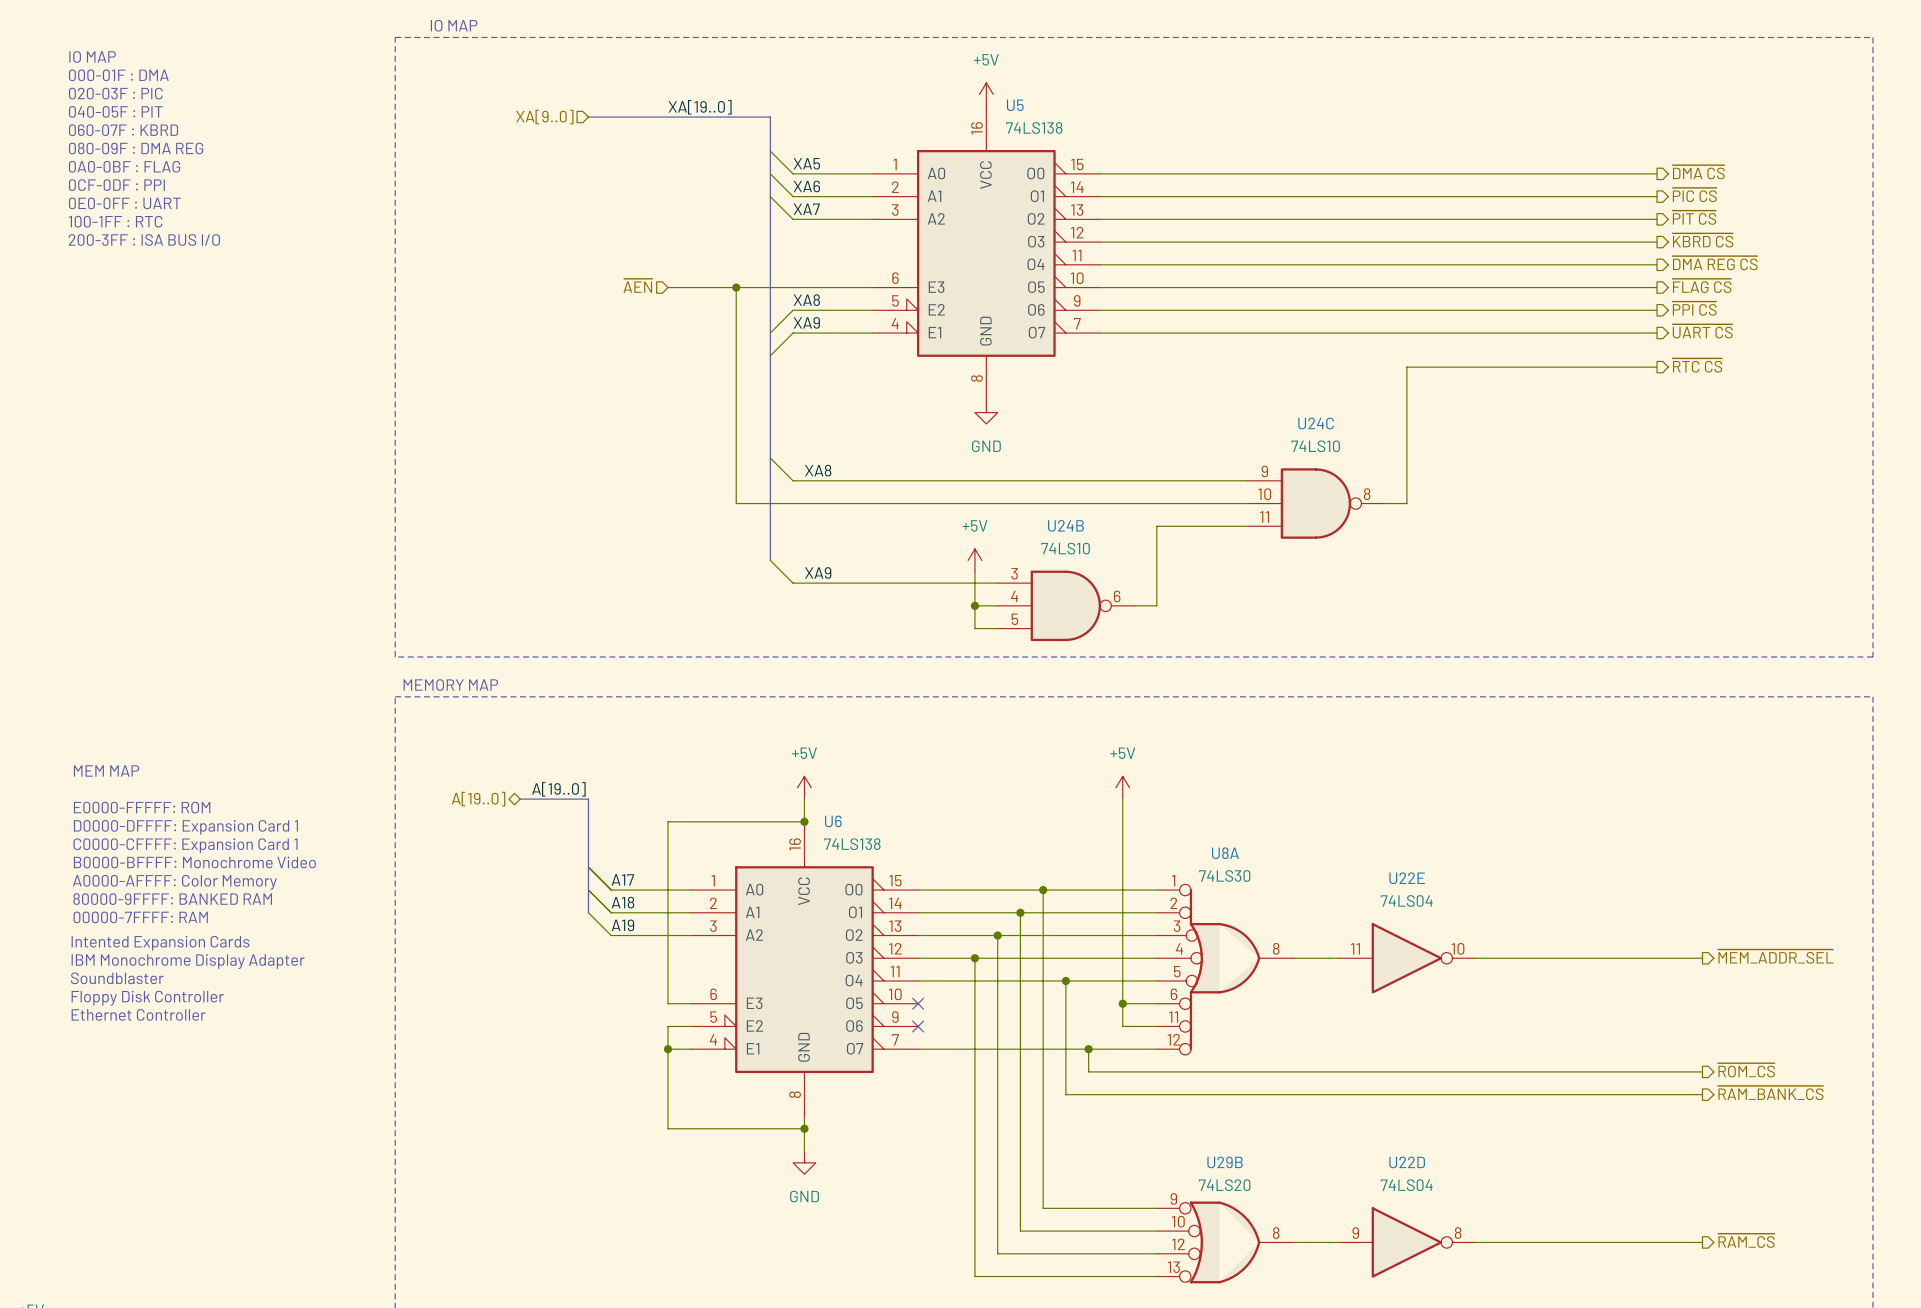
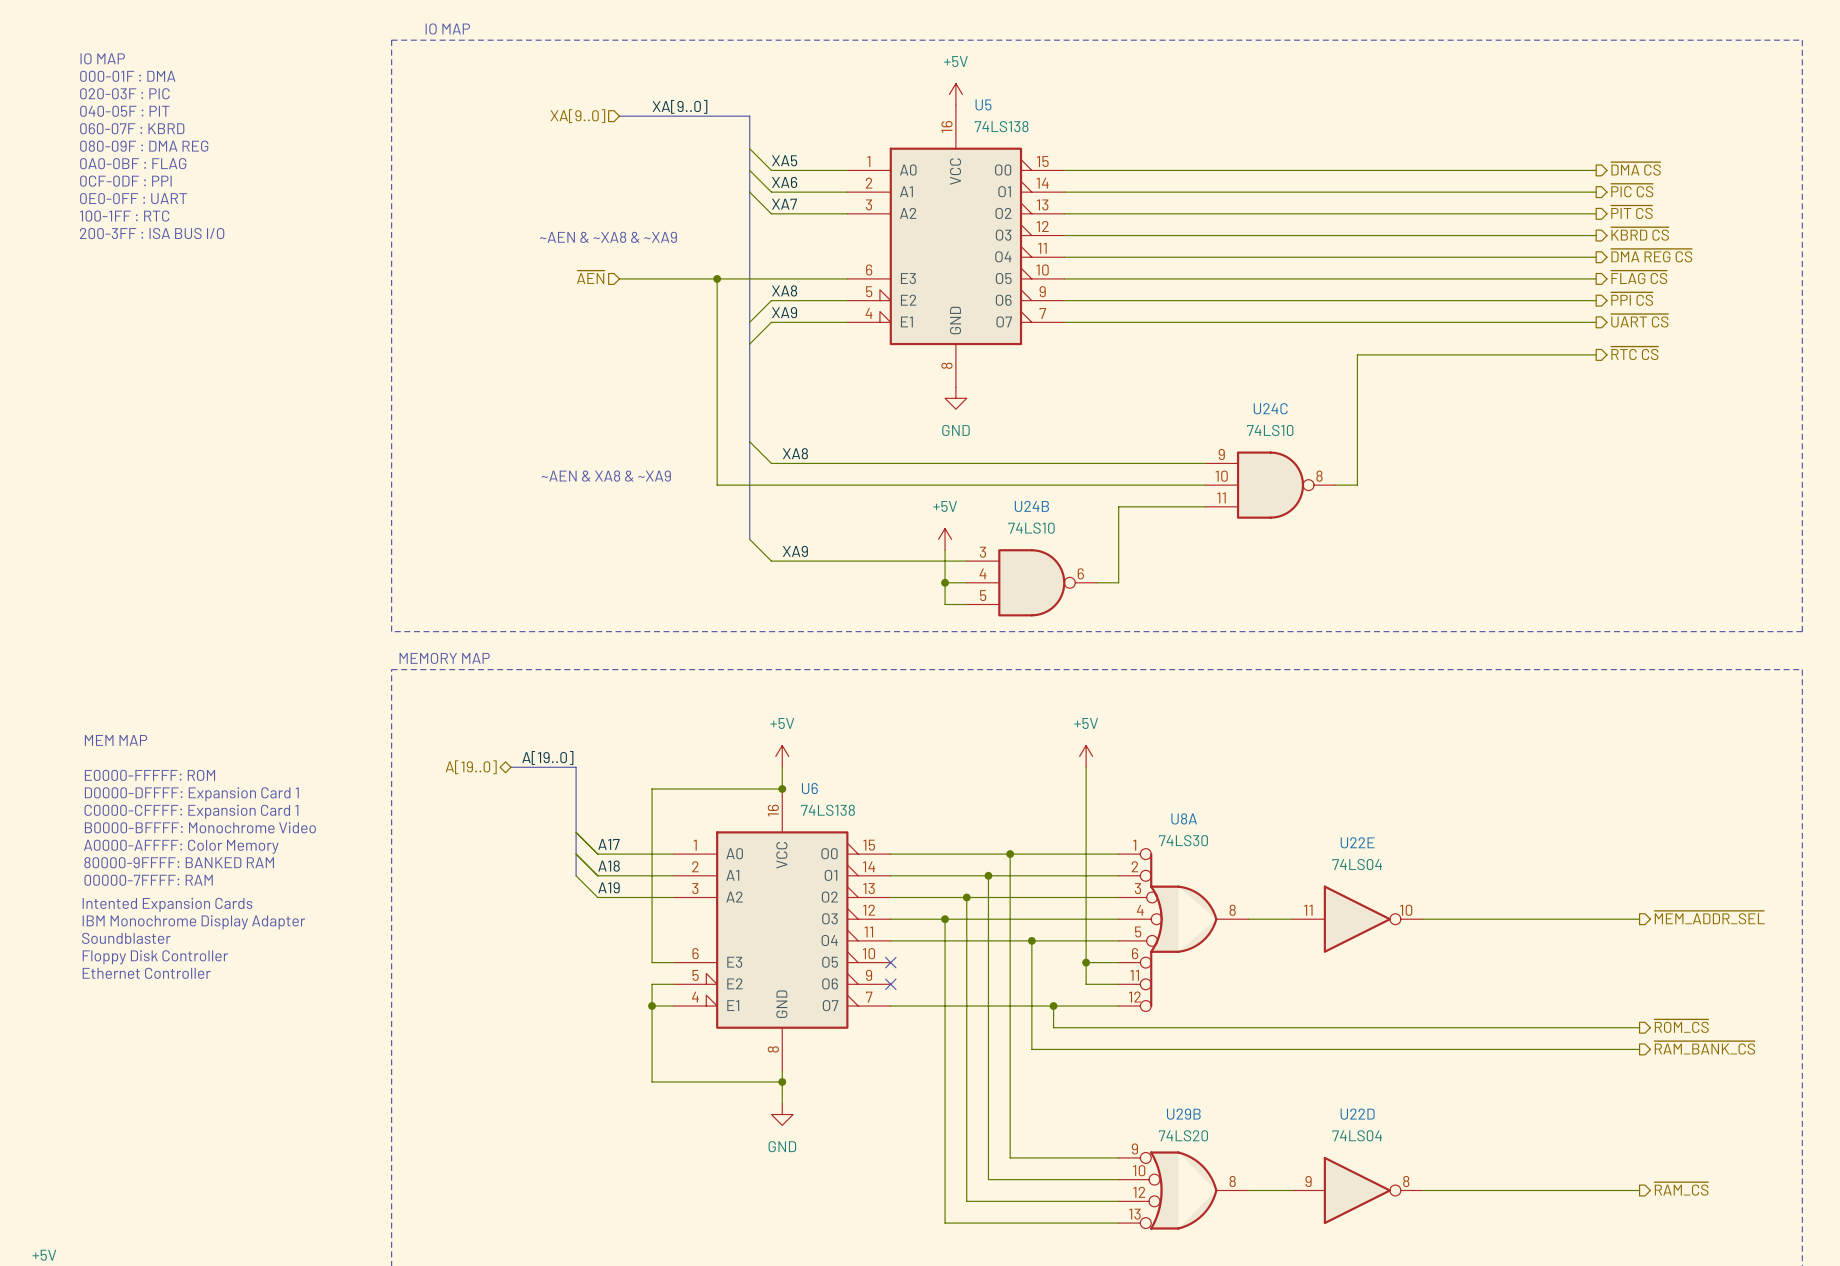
label: XA[19..0] (700, 107) -> XA[9..0] (679, 106)
hierarchical label position: XA[9..0] (544, 117) -> XA[9..0] (577, 116)
bus: (588, 117) (633, 117) -> none
text: none -> ~AEN & ~XA8 & ~XA9 (608, 237)
hierarchical label position: ~{AEN} (637, 285) -> ~{AEN} (590, 277)
wire: none -> (619, 278) (652, 278)
text: none -> ~AEN & XA8 & ~XA9 (606, 476)

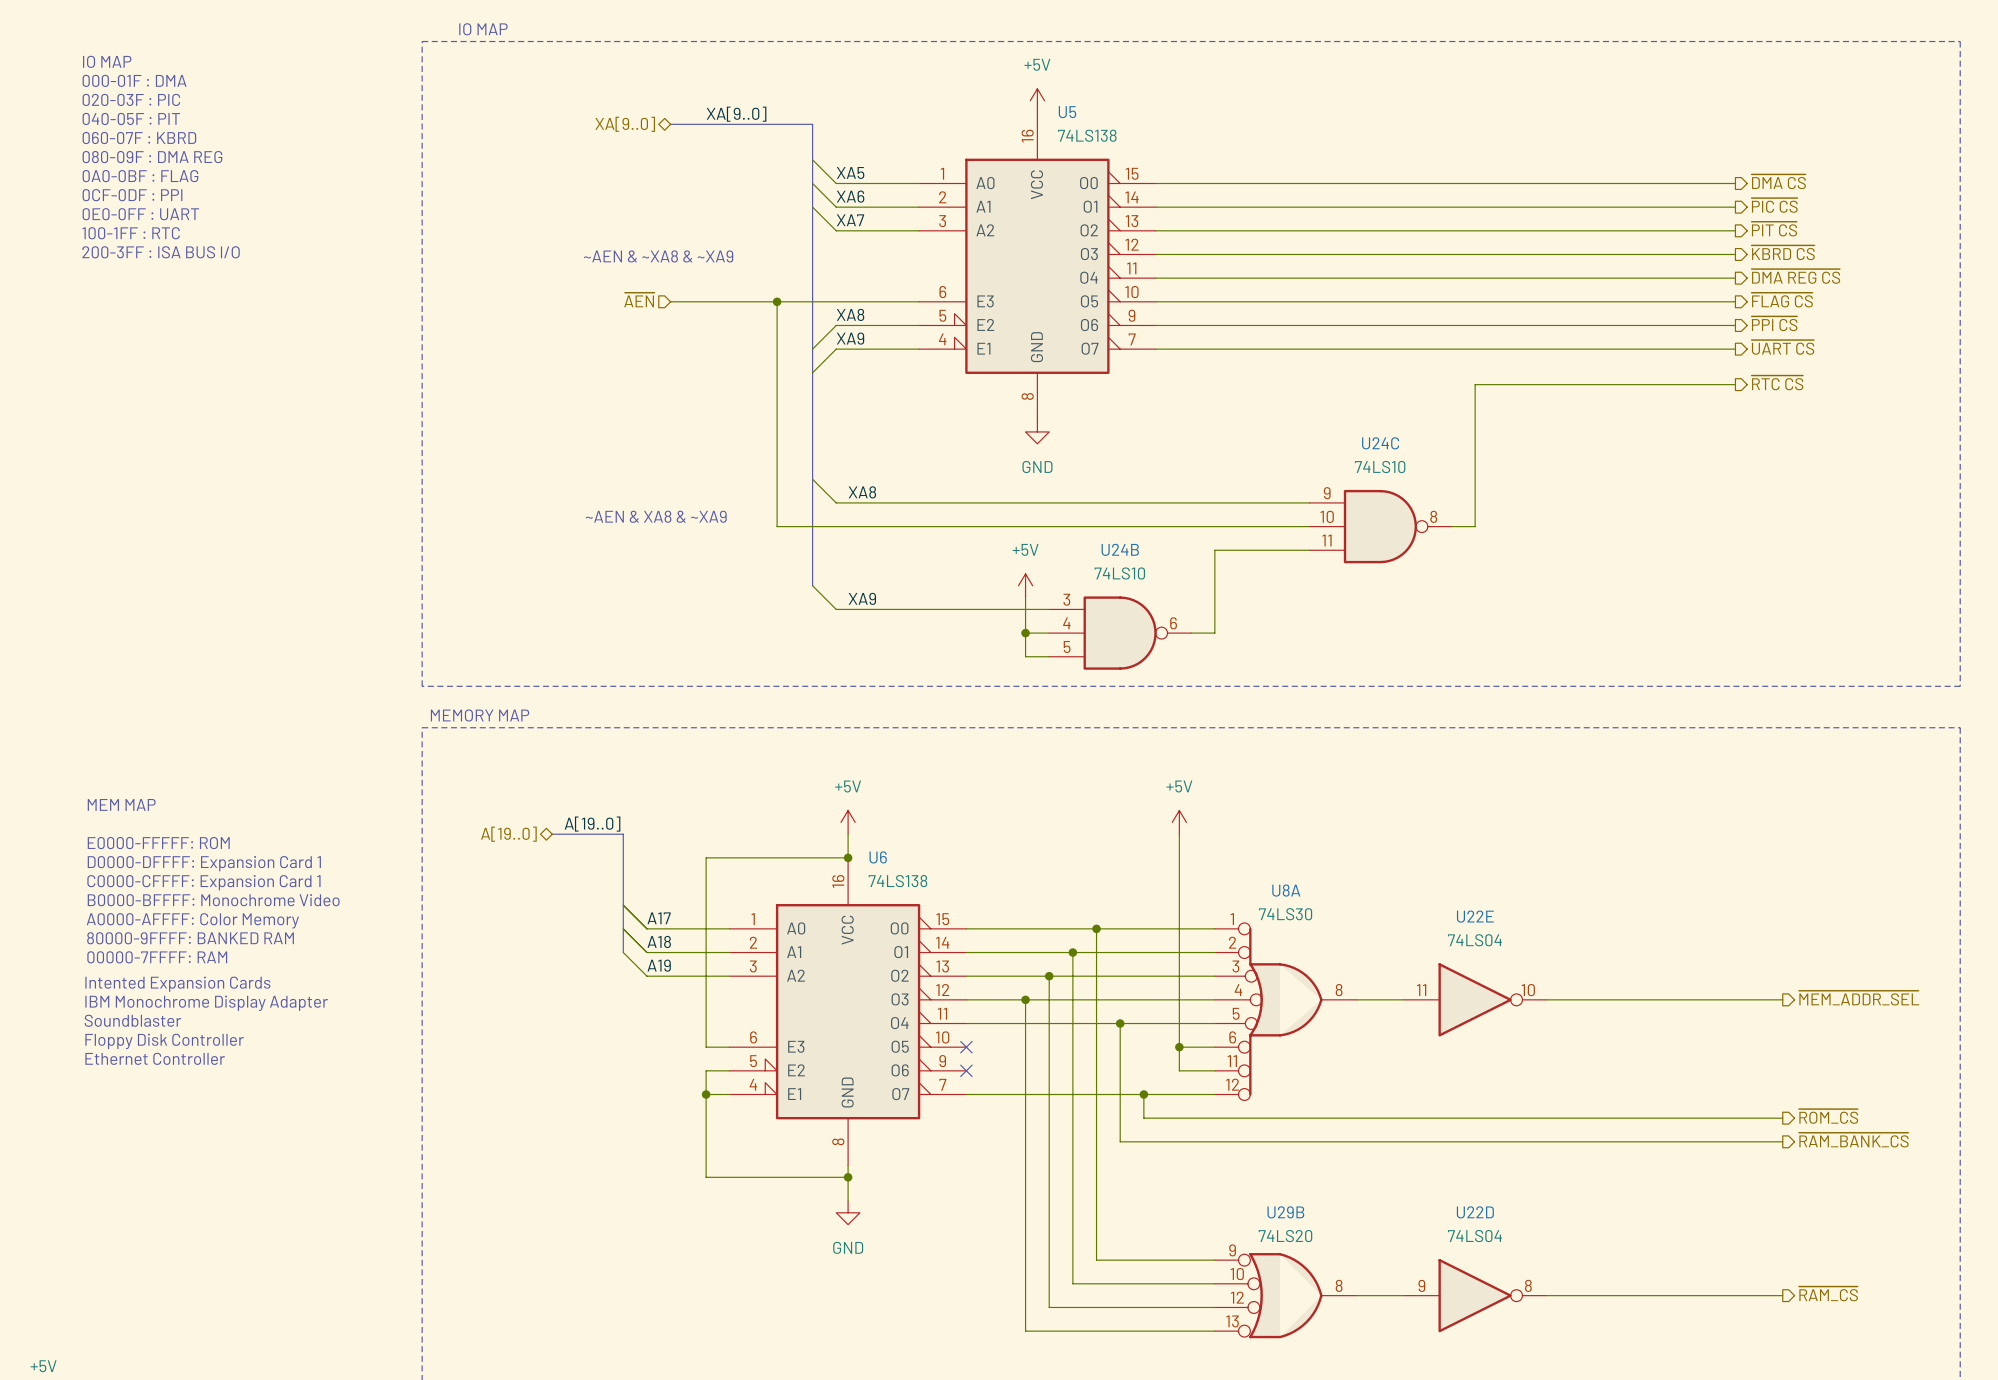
hierarchical label shape: input (577, 116) -> bidirectional (625, 124)

